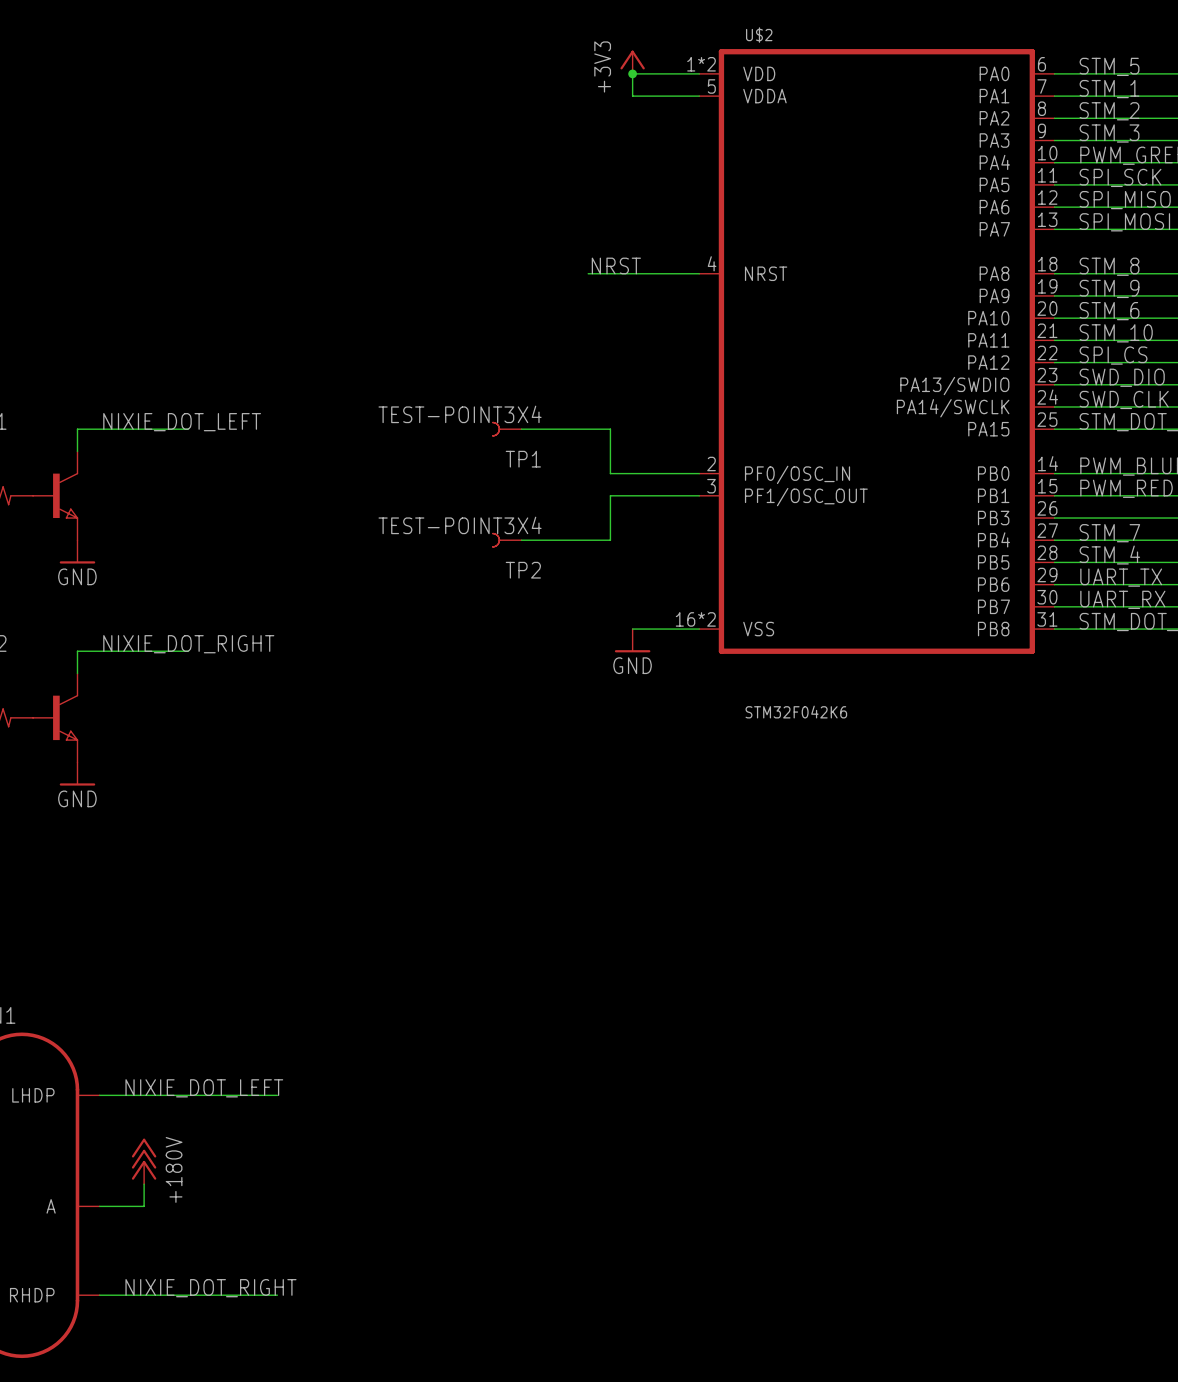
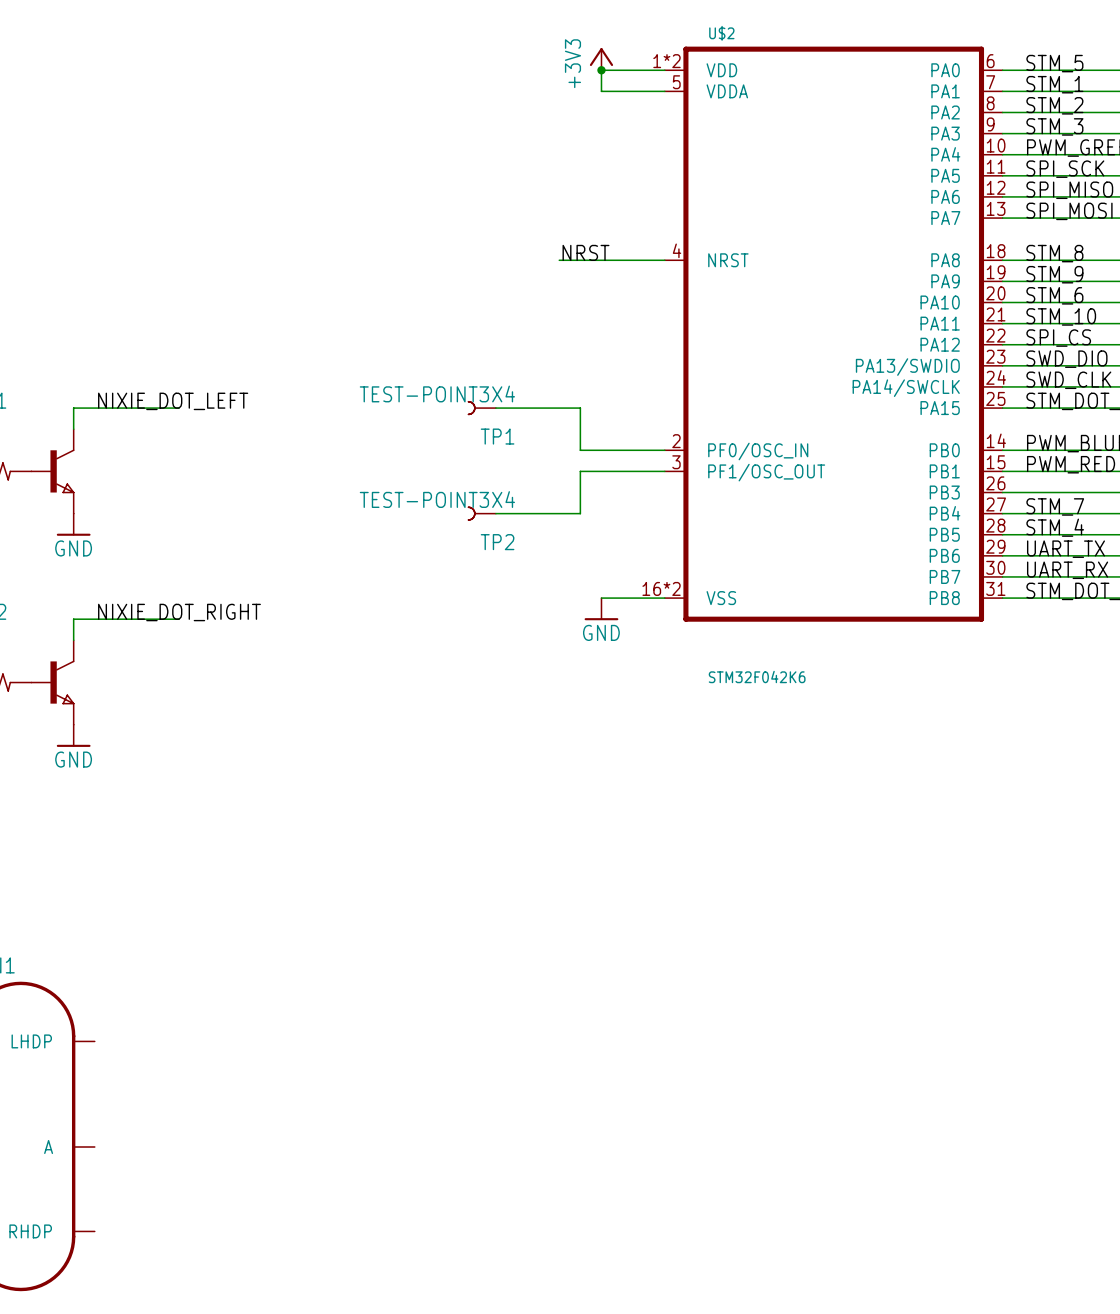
label: NIXIE_DOT_LEFT (204, 1088) -> none
wire: (99, 1095) (277, 1095) -> none
power symbol: +180V (144, 1161) -> none
wire: (144, 1184) (144, 1206) (99, 1206) -> none
label: NIXIE_DOT_RIGHT (210, 1288) -> none
wire: (99, 1295) (277, 1295) -> none

